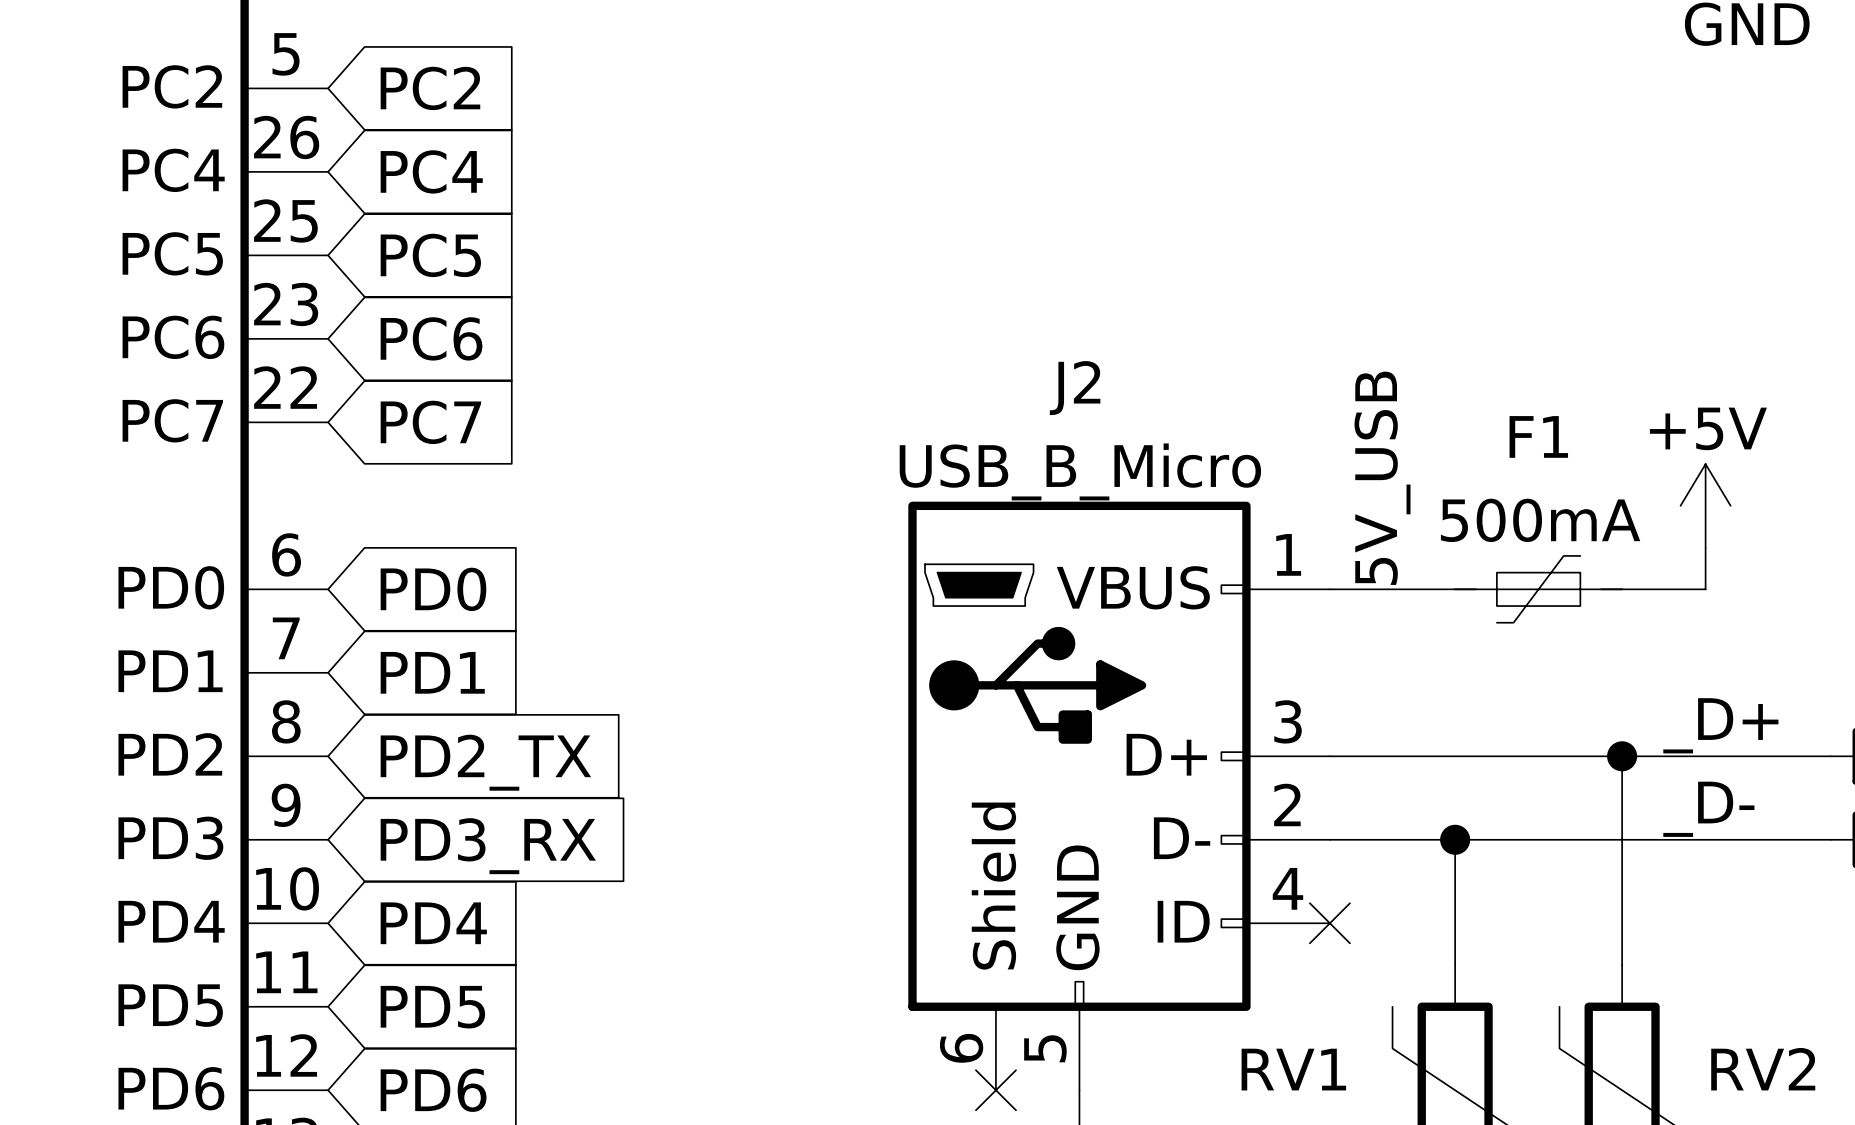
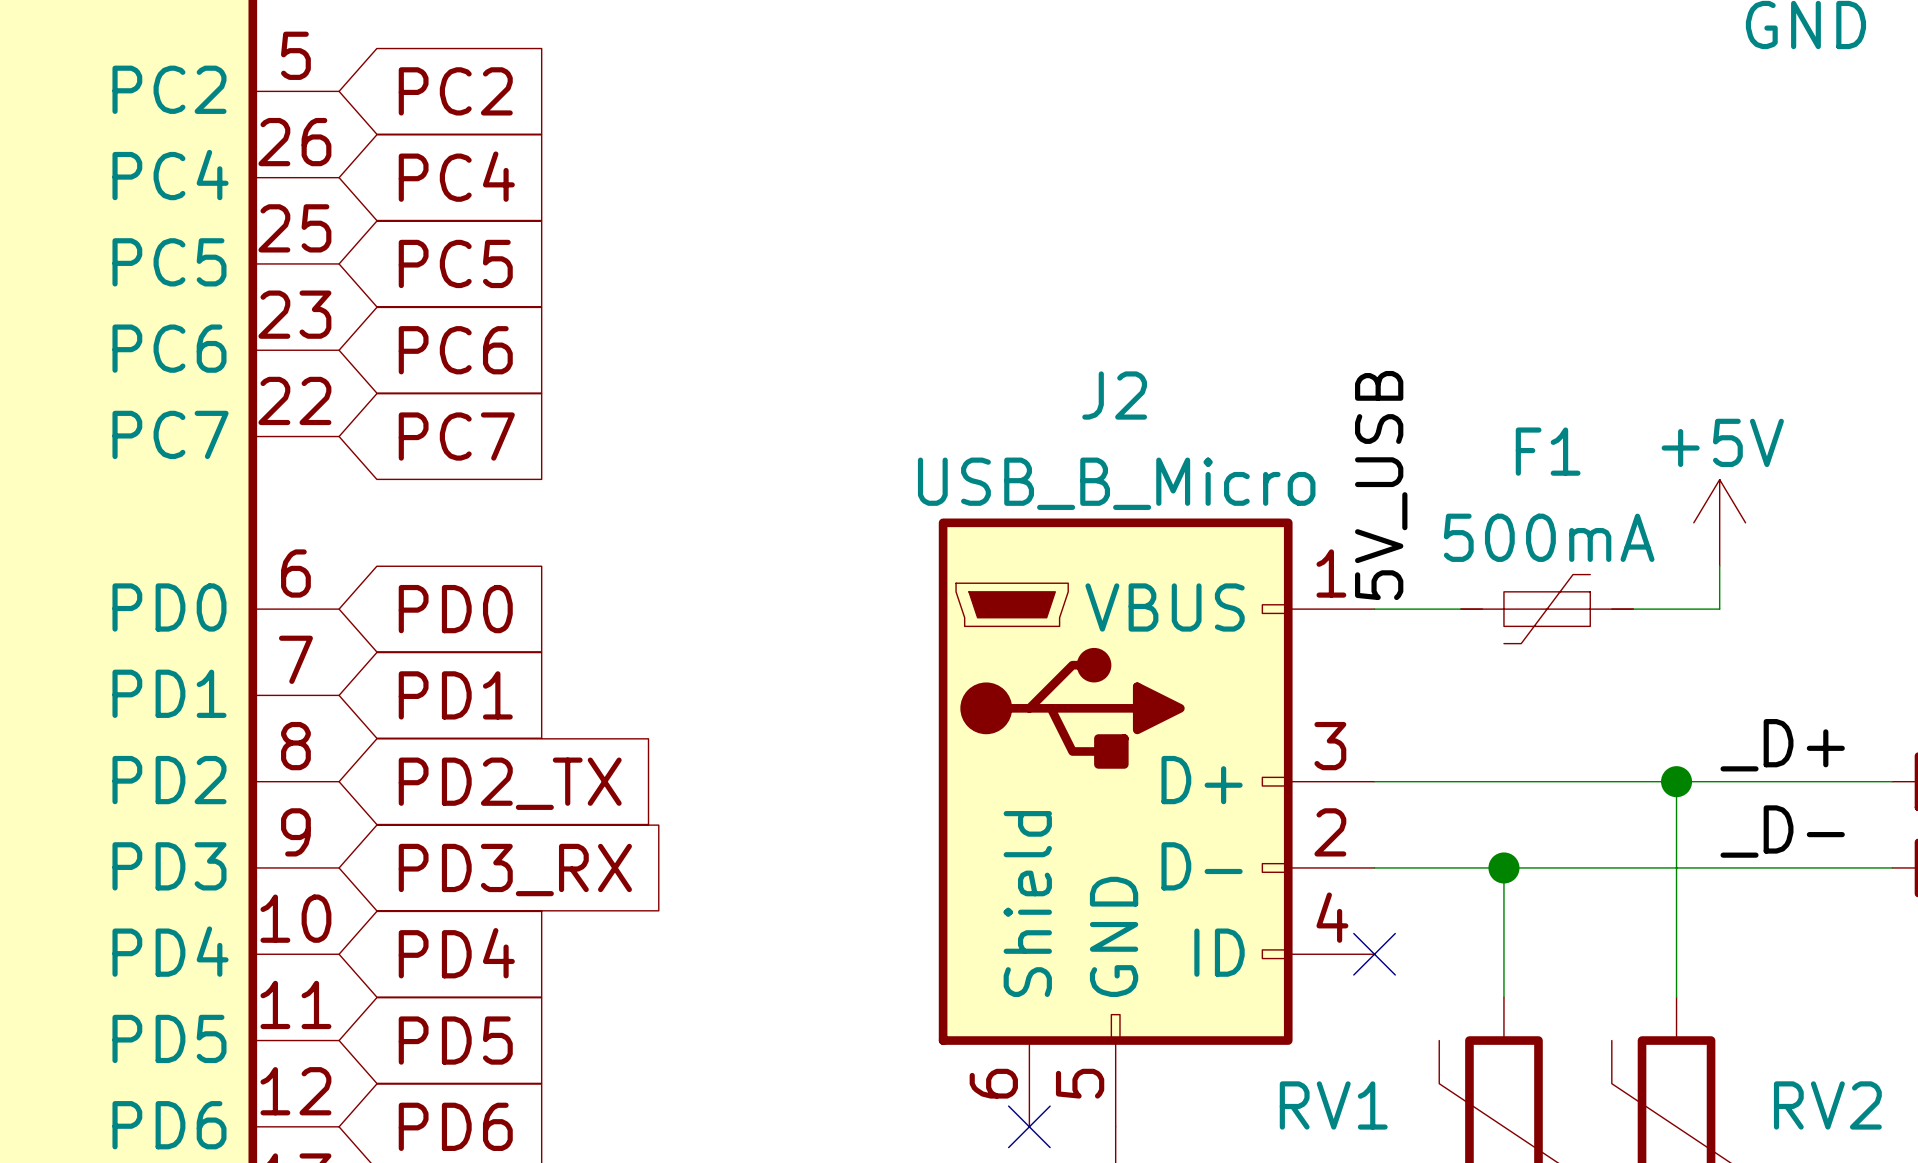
label position: 5V_USB (1382, 478) -> 5V_USB (1381, 485)
power symbol position: +5V (1705, 505) -> +5V (1719, 522)
wire: (1705, 547) (1705, 589) (1663, 589) -> (1719, 565) (1719, 609)
F1 position: (1538, 589) -> (1547, 609)

